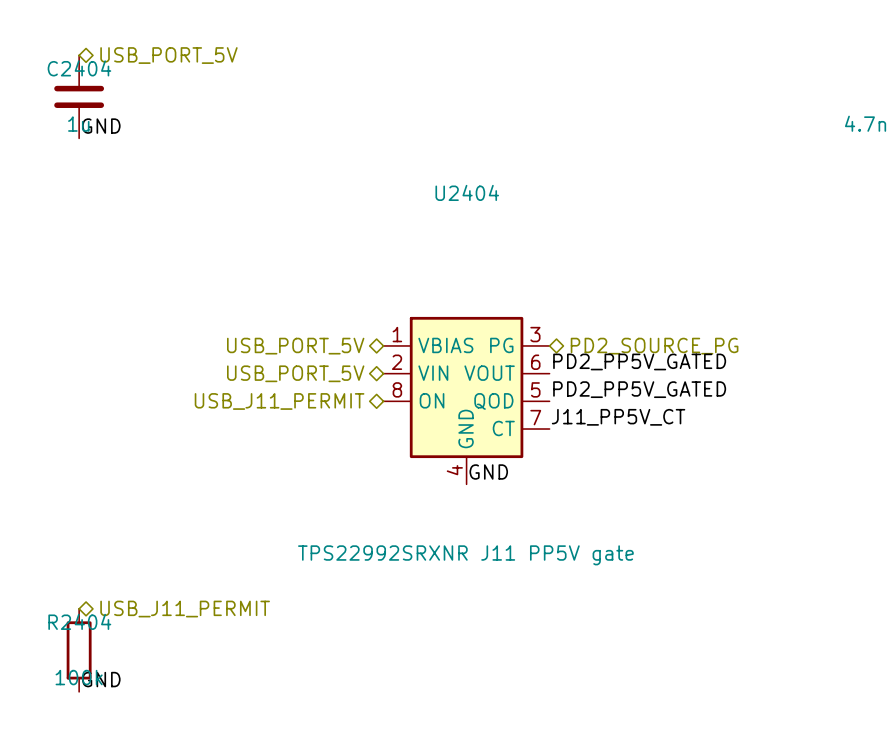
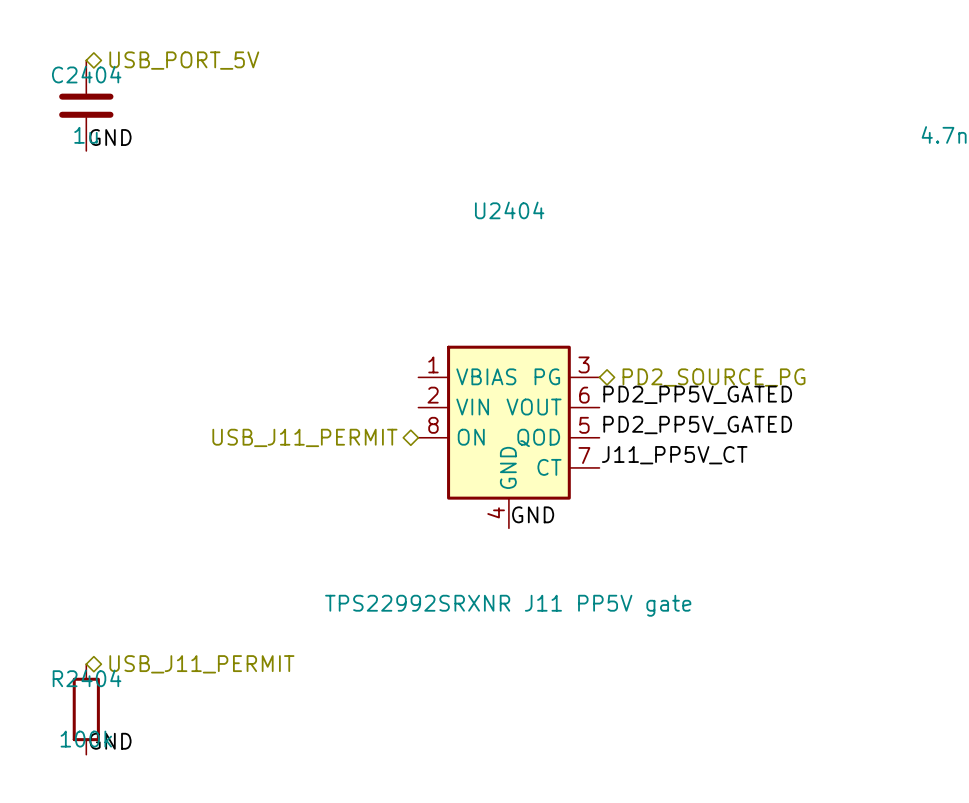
hierarchical label: USB_PORT_5V (295, 346) -> none
hierarchical label: USB_PORT_5V (295, 373) -> none

